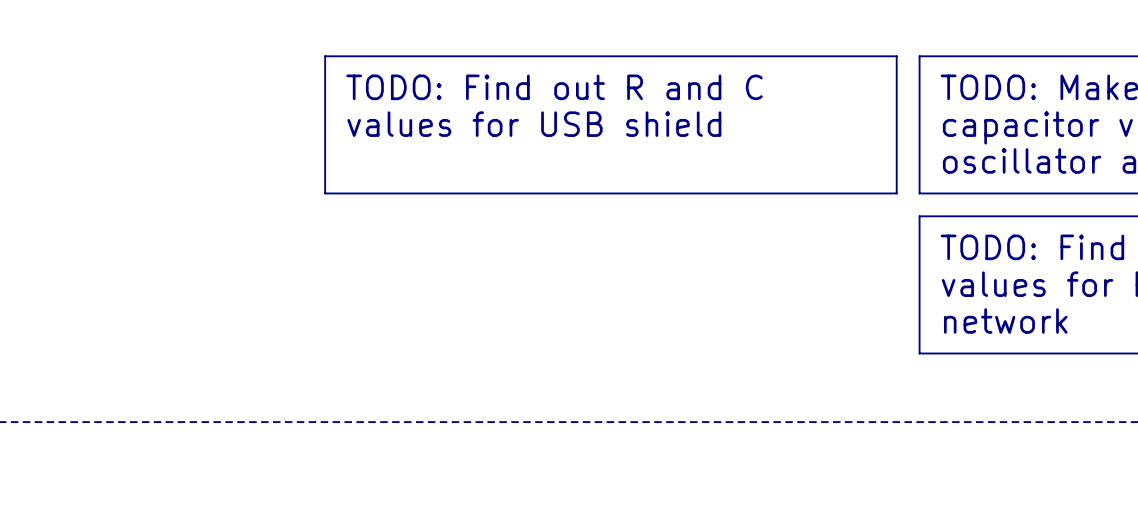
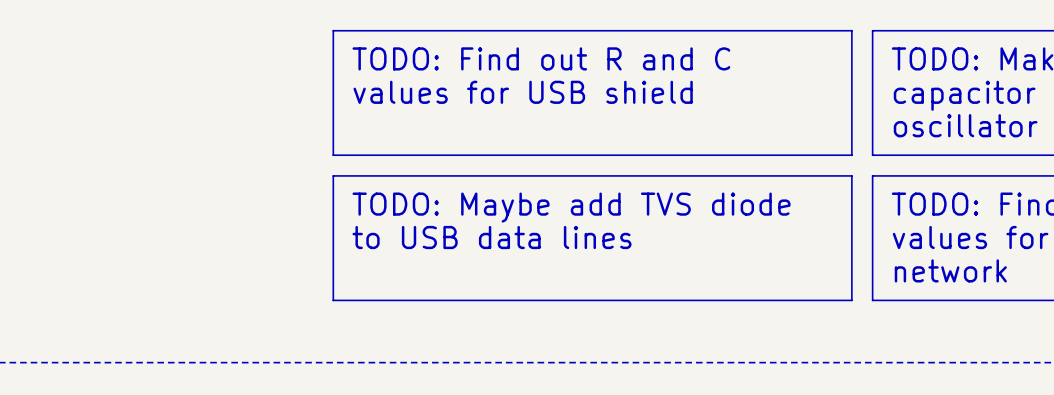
line: none -> (333, 175) (851, 175) (851, 300) (333, 300) (333, 175)
text: none -> TODO: Maybe add TVS diode (571, 207)
text: none -> to USB data lines (492, 237)

